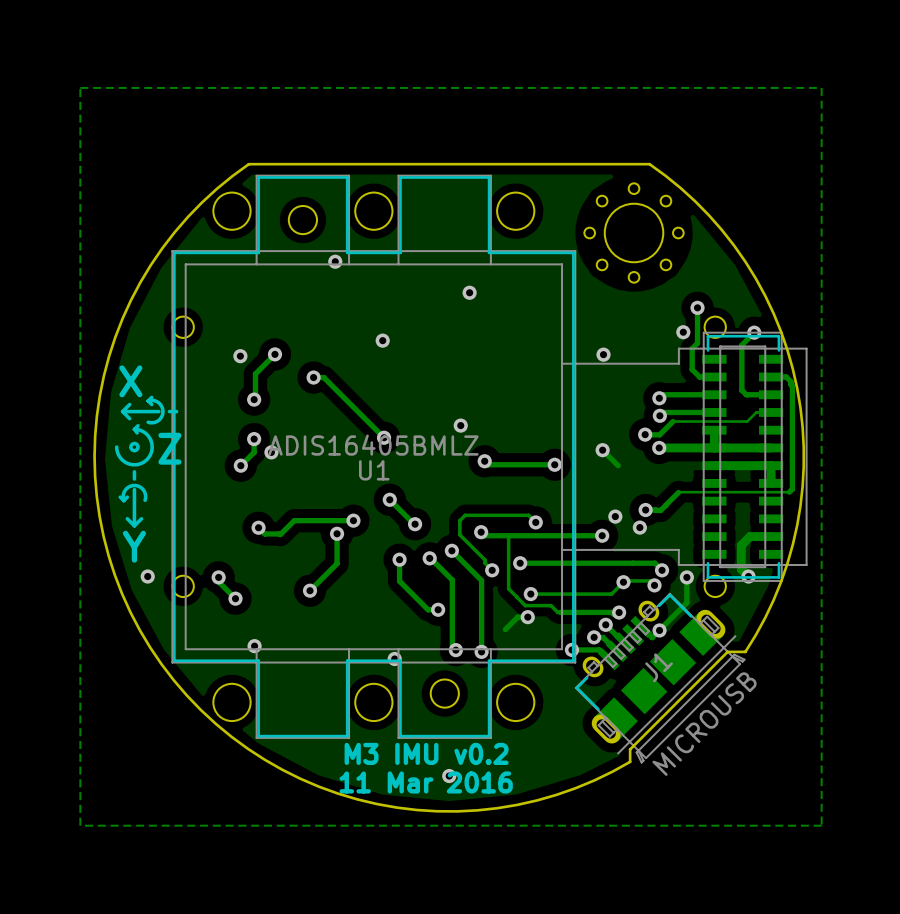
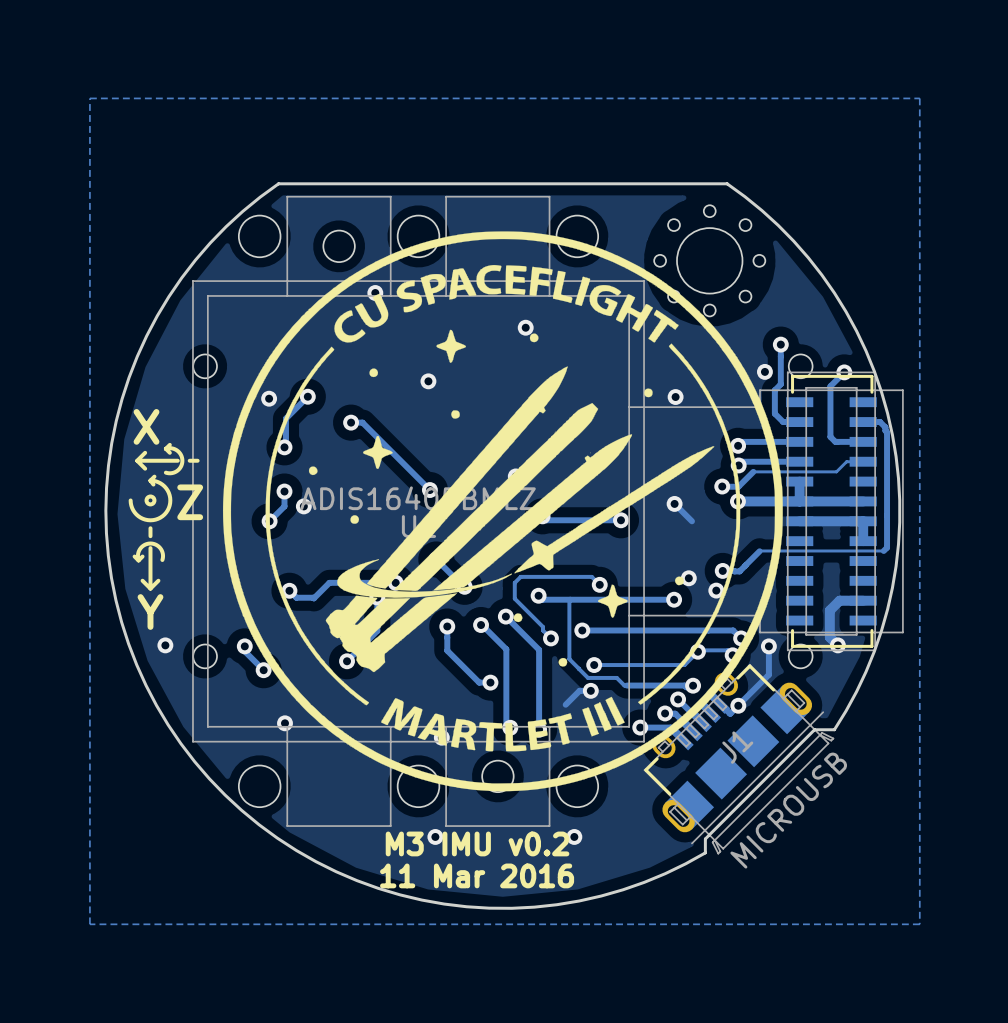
U1 footprint: [172, 175, 807, 739] -> [192, 196, 904, 827]
drawing: none -> [222, 231, 783, 792]
via: none -> (435, 836)
via: none -> (574, 836)
via: (449, 776) -> none

